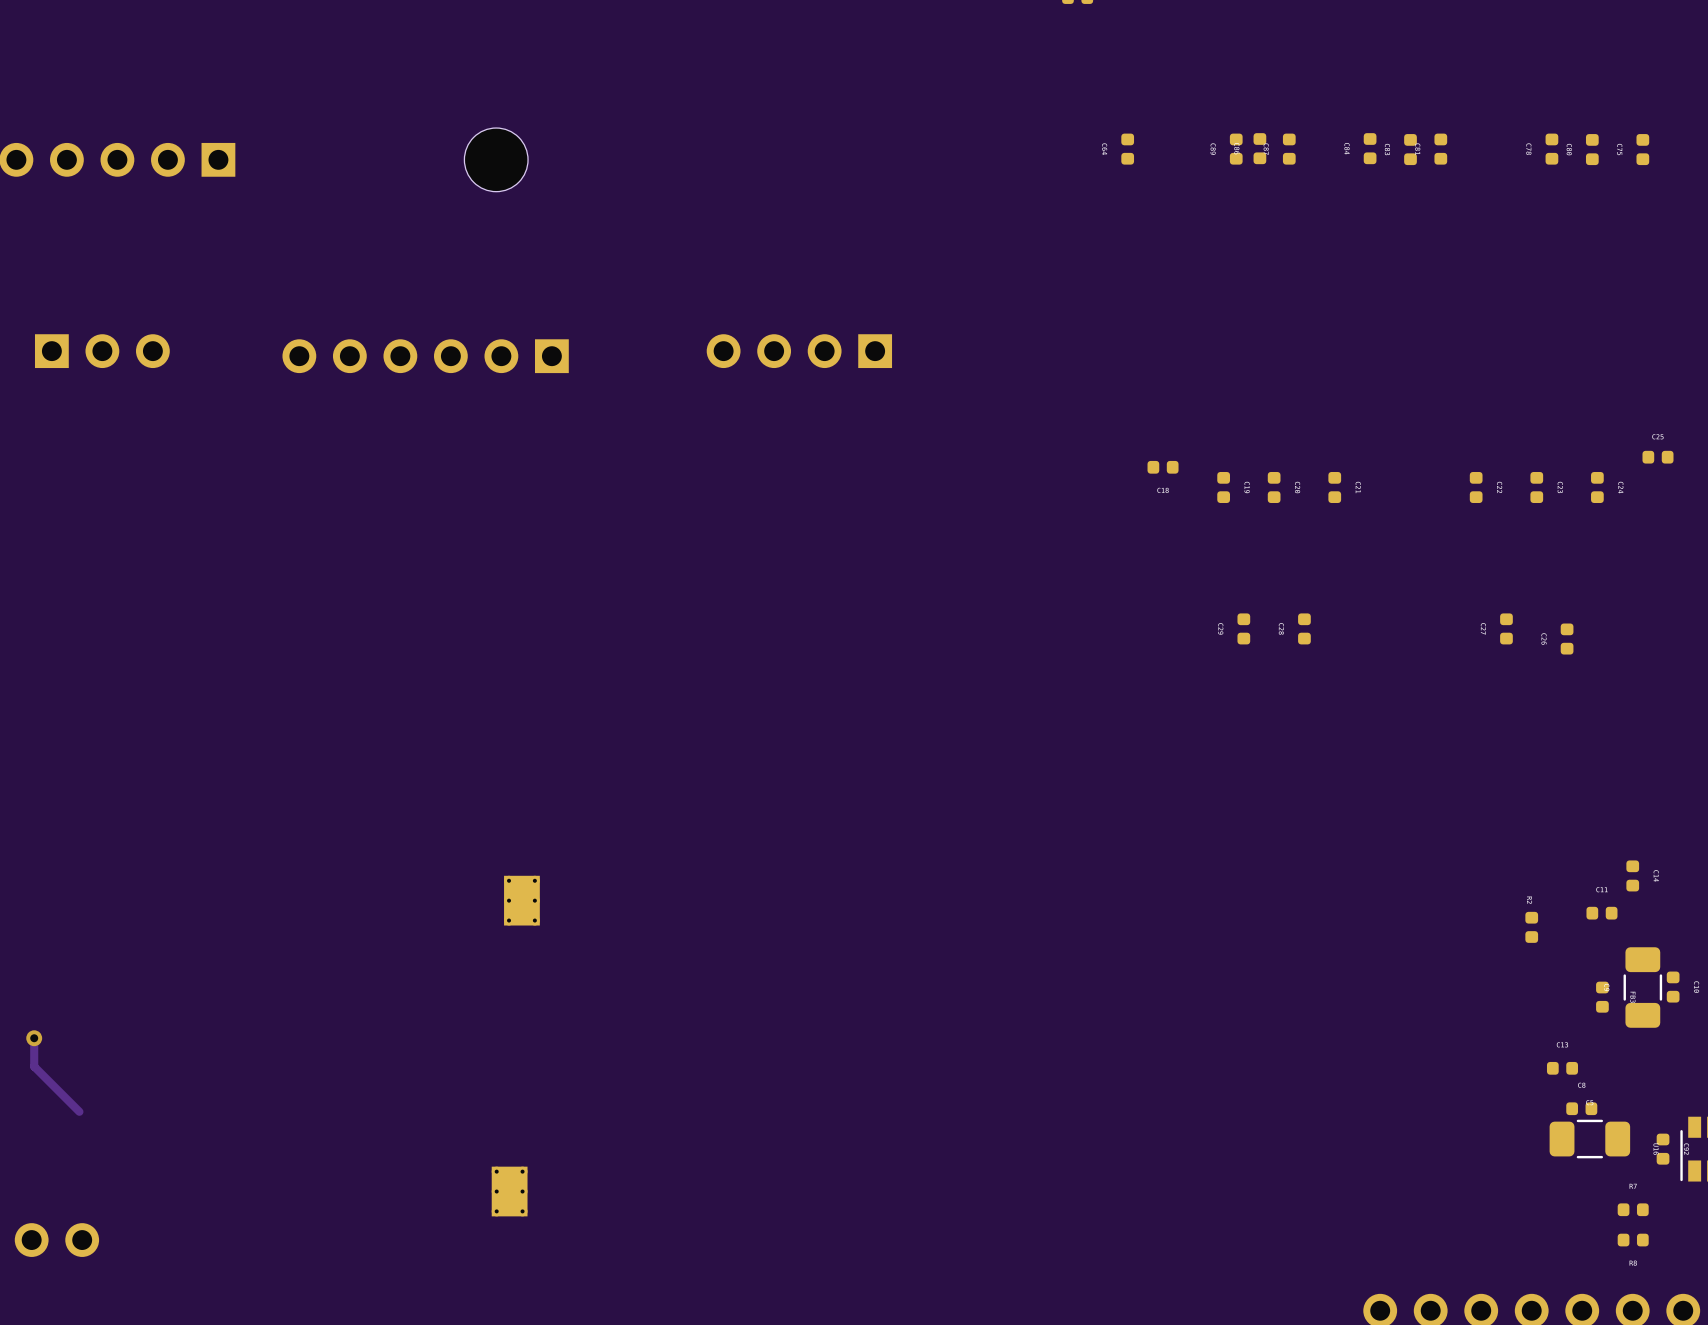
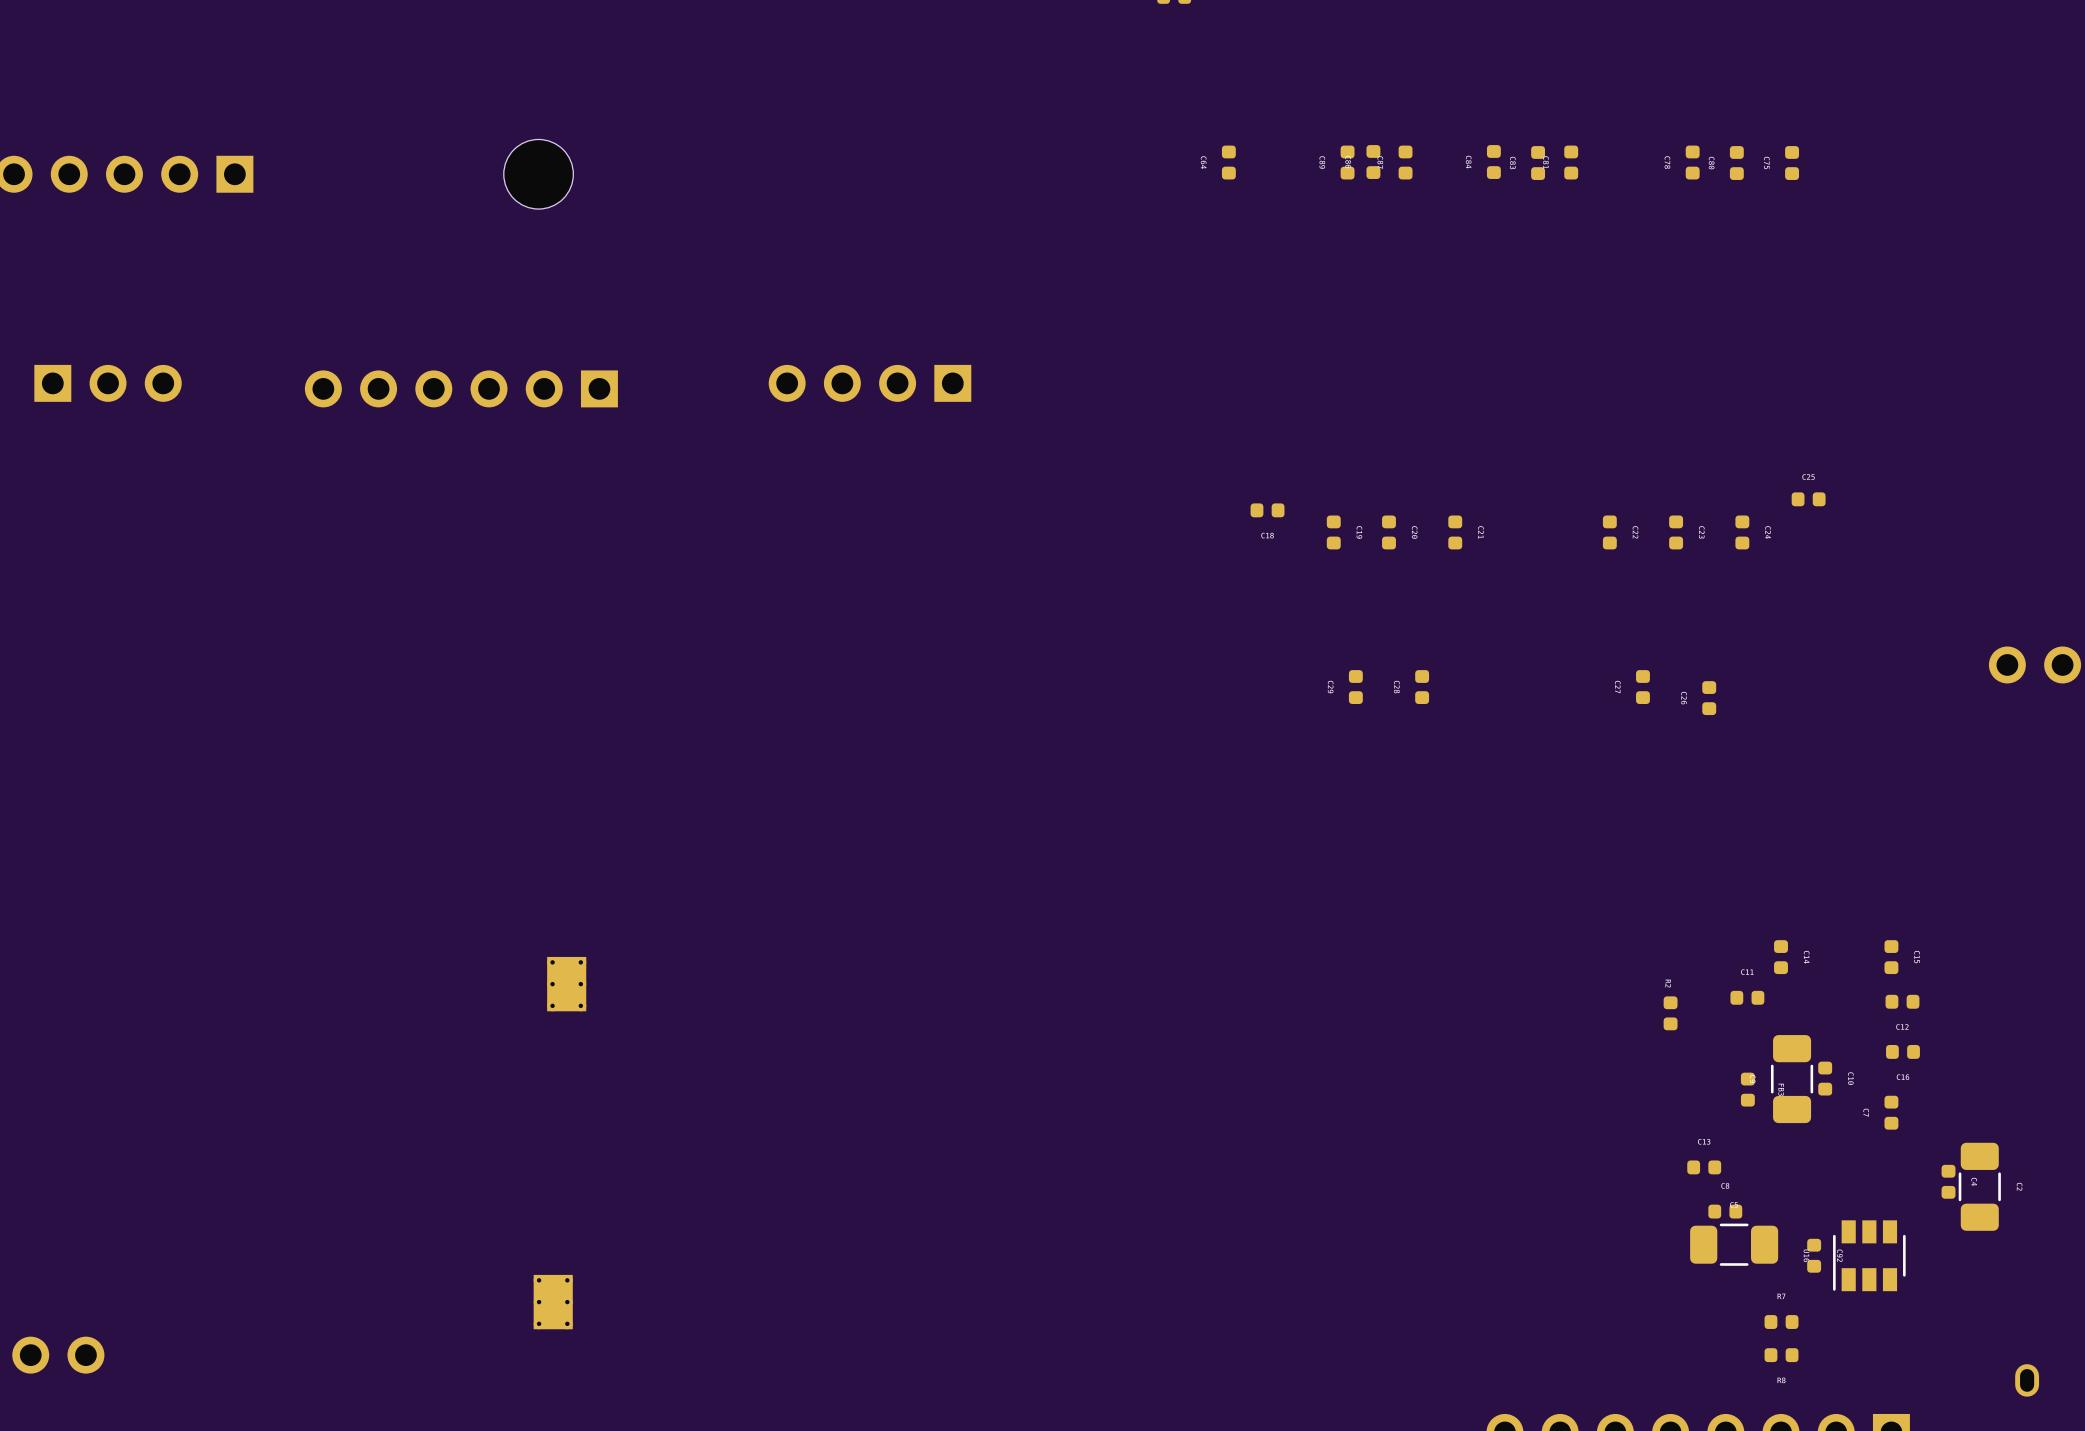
track: (34, 1038) (34, 1066) (79, 1111) -> none
via: (34, 1038) -> none

